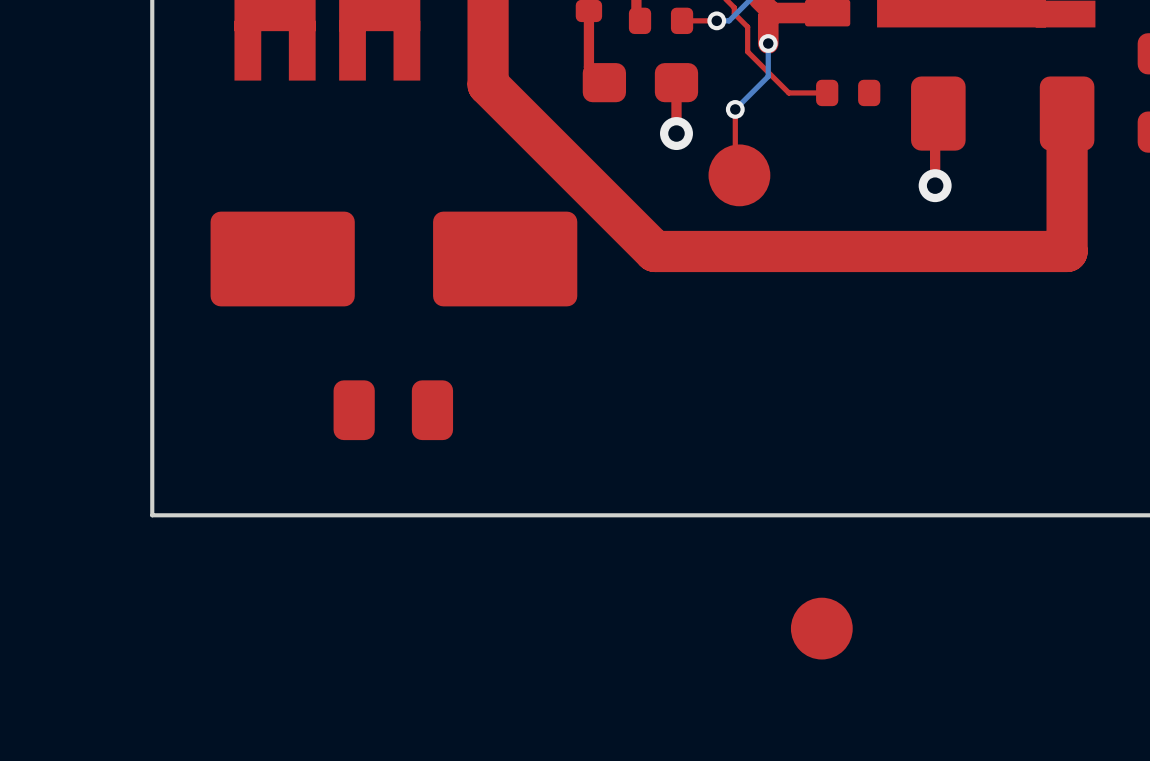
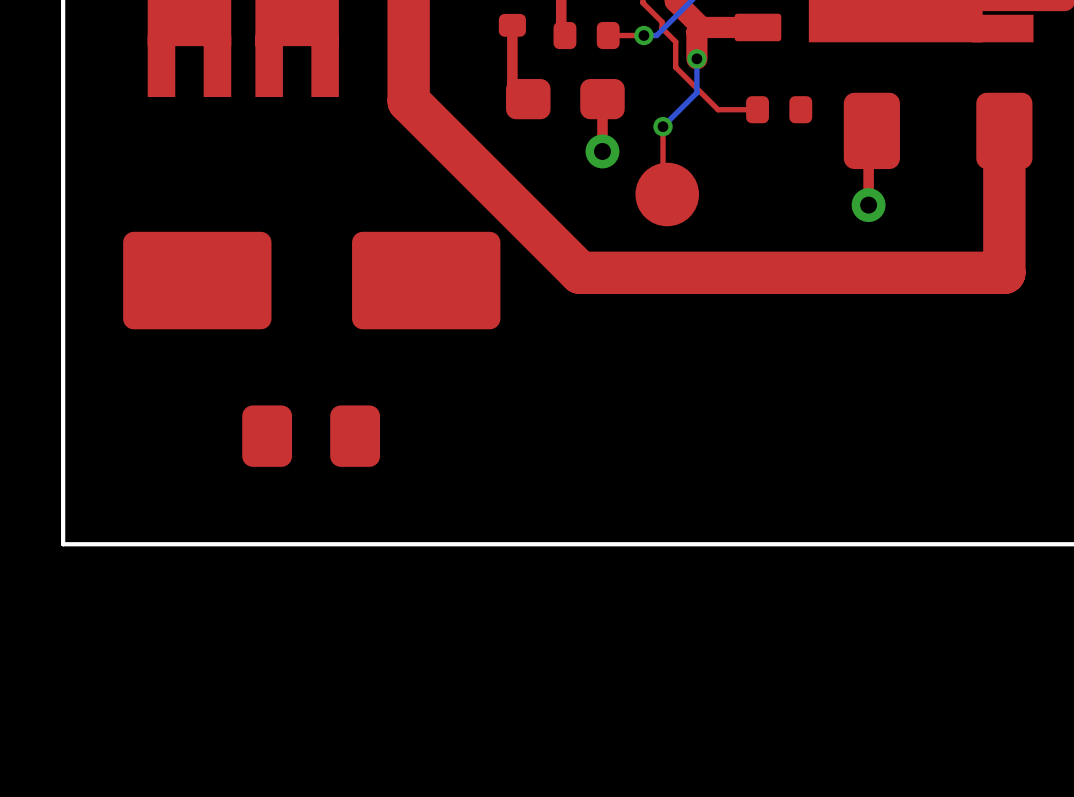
part footprint: [333, 380, 454, 441] -> [242, 405, 381, 467]
part: (821, 628) -> none

